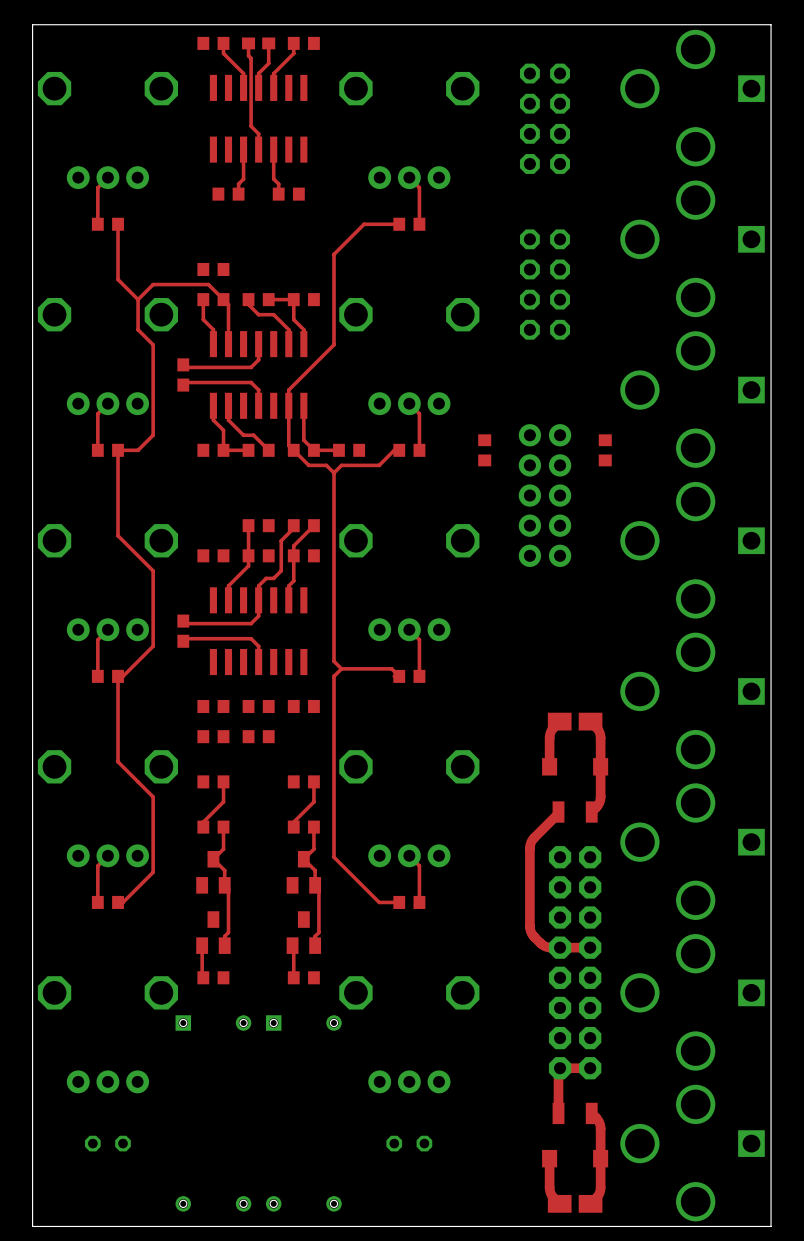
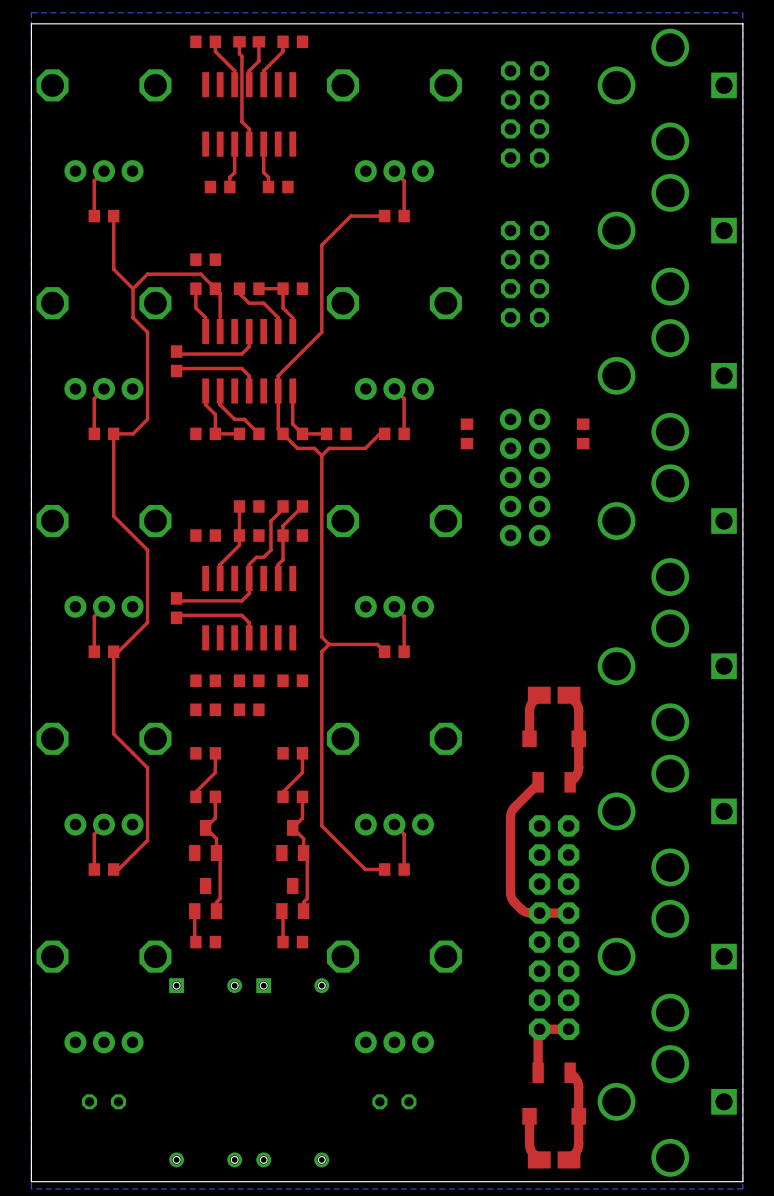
bottom zone outline: none -> (742, 12) (742, 1188) (31, 1188) (31, 12) (742, 12)

